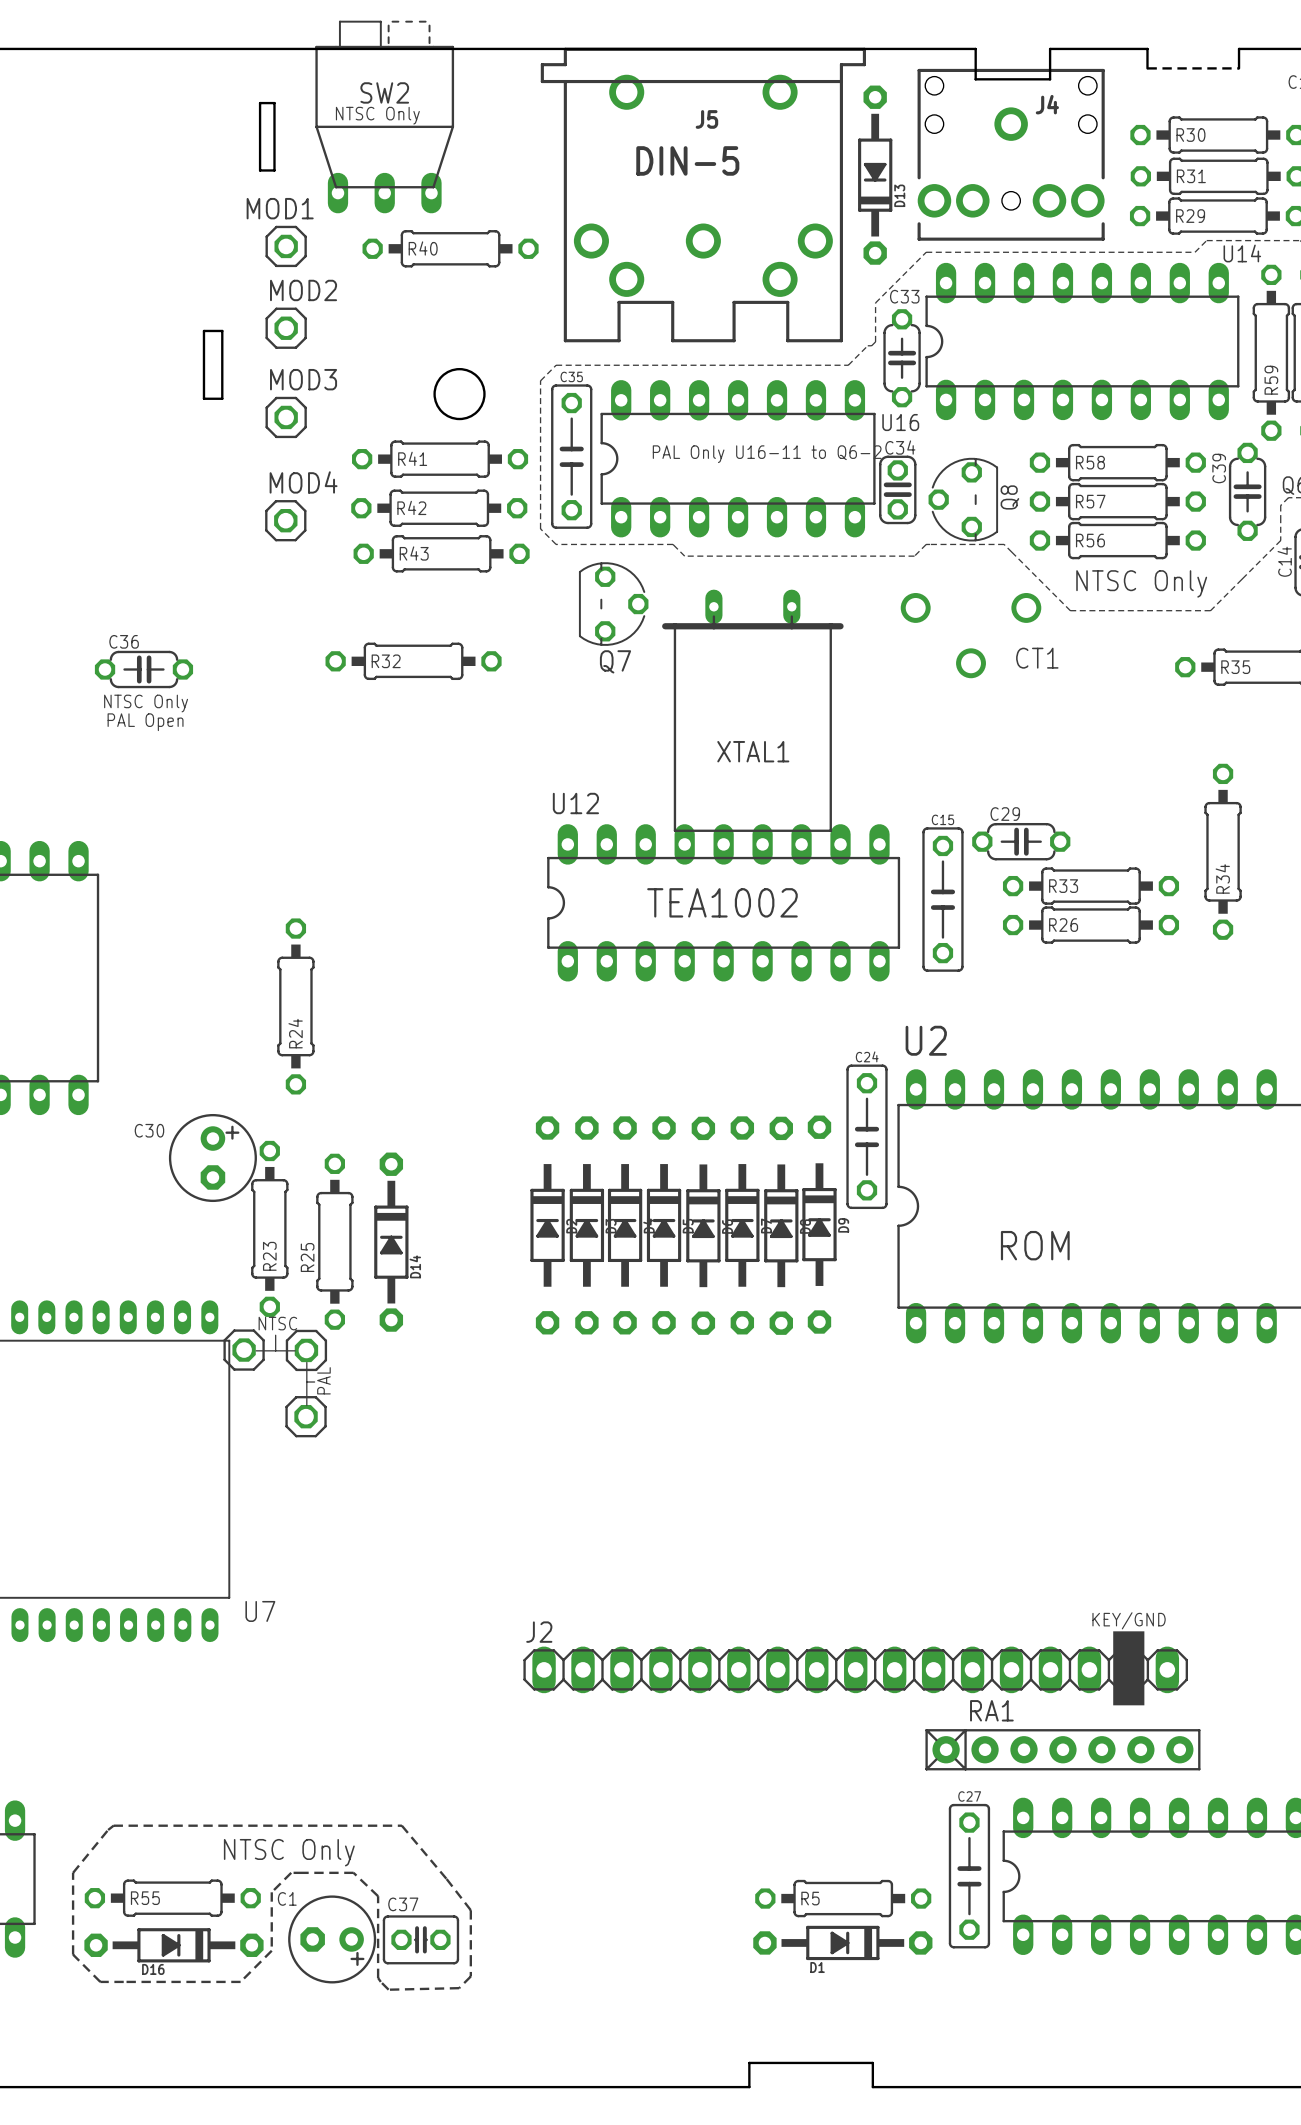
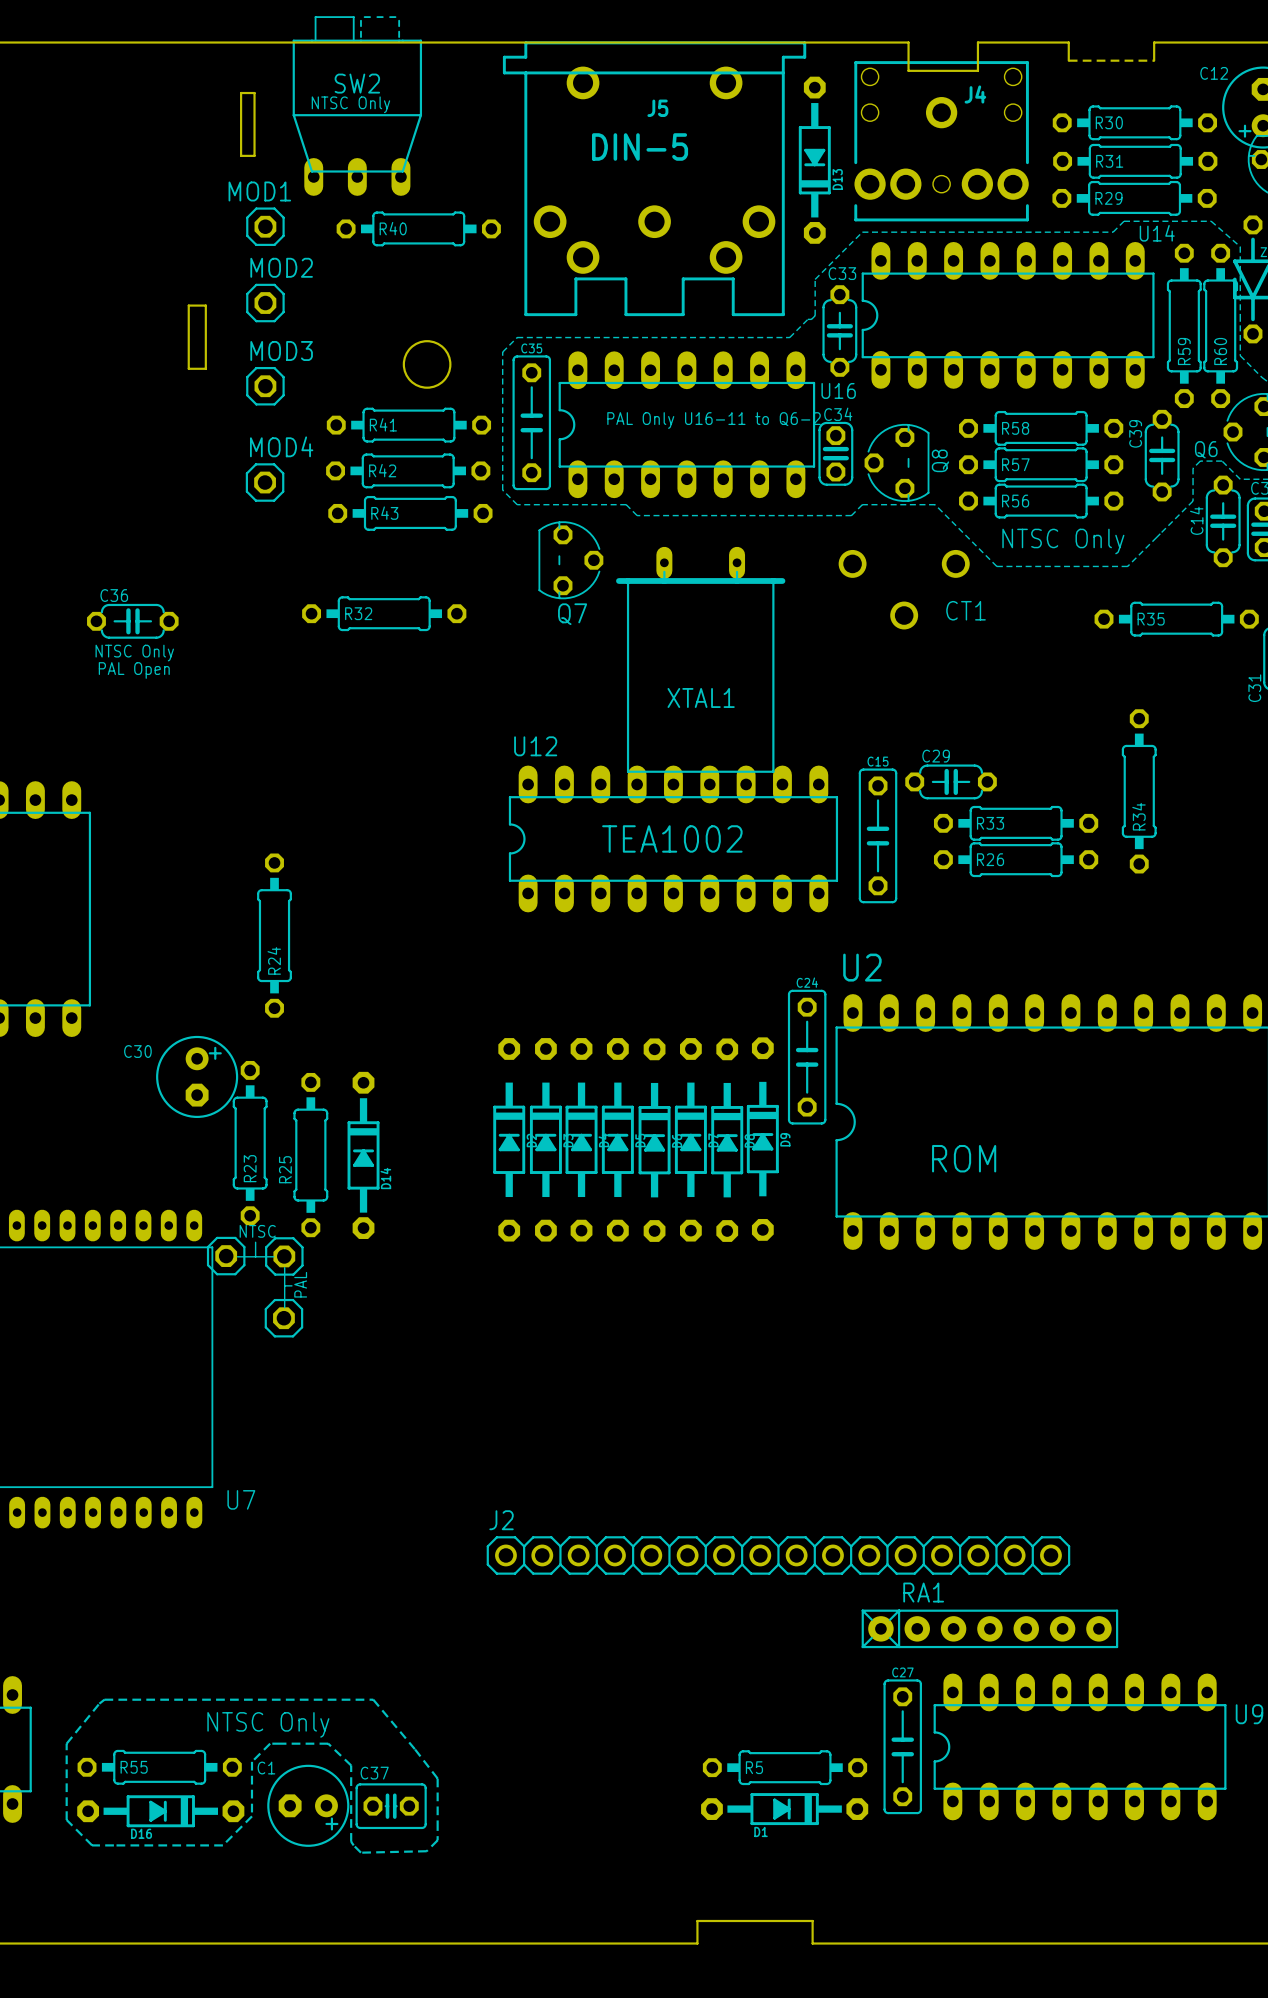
text: KEY/GND (1129, 1620) -> none
drawing: [1113, 1631, 1145, 1706] -> none
J2 footprint: [523, 1646, 1189, 1694] -> [486, 1536, 1071, 1575]

